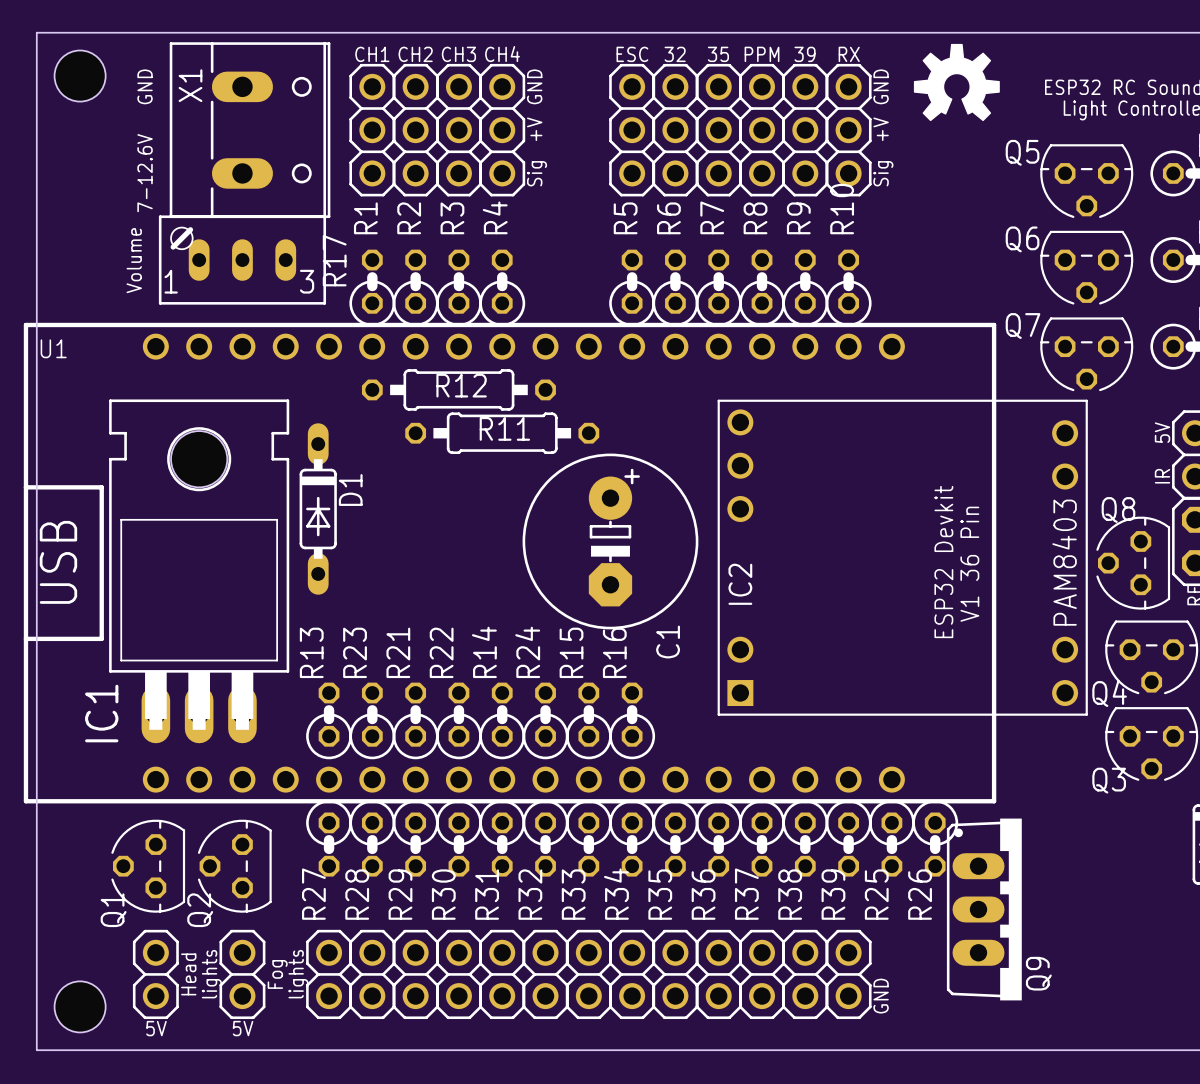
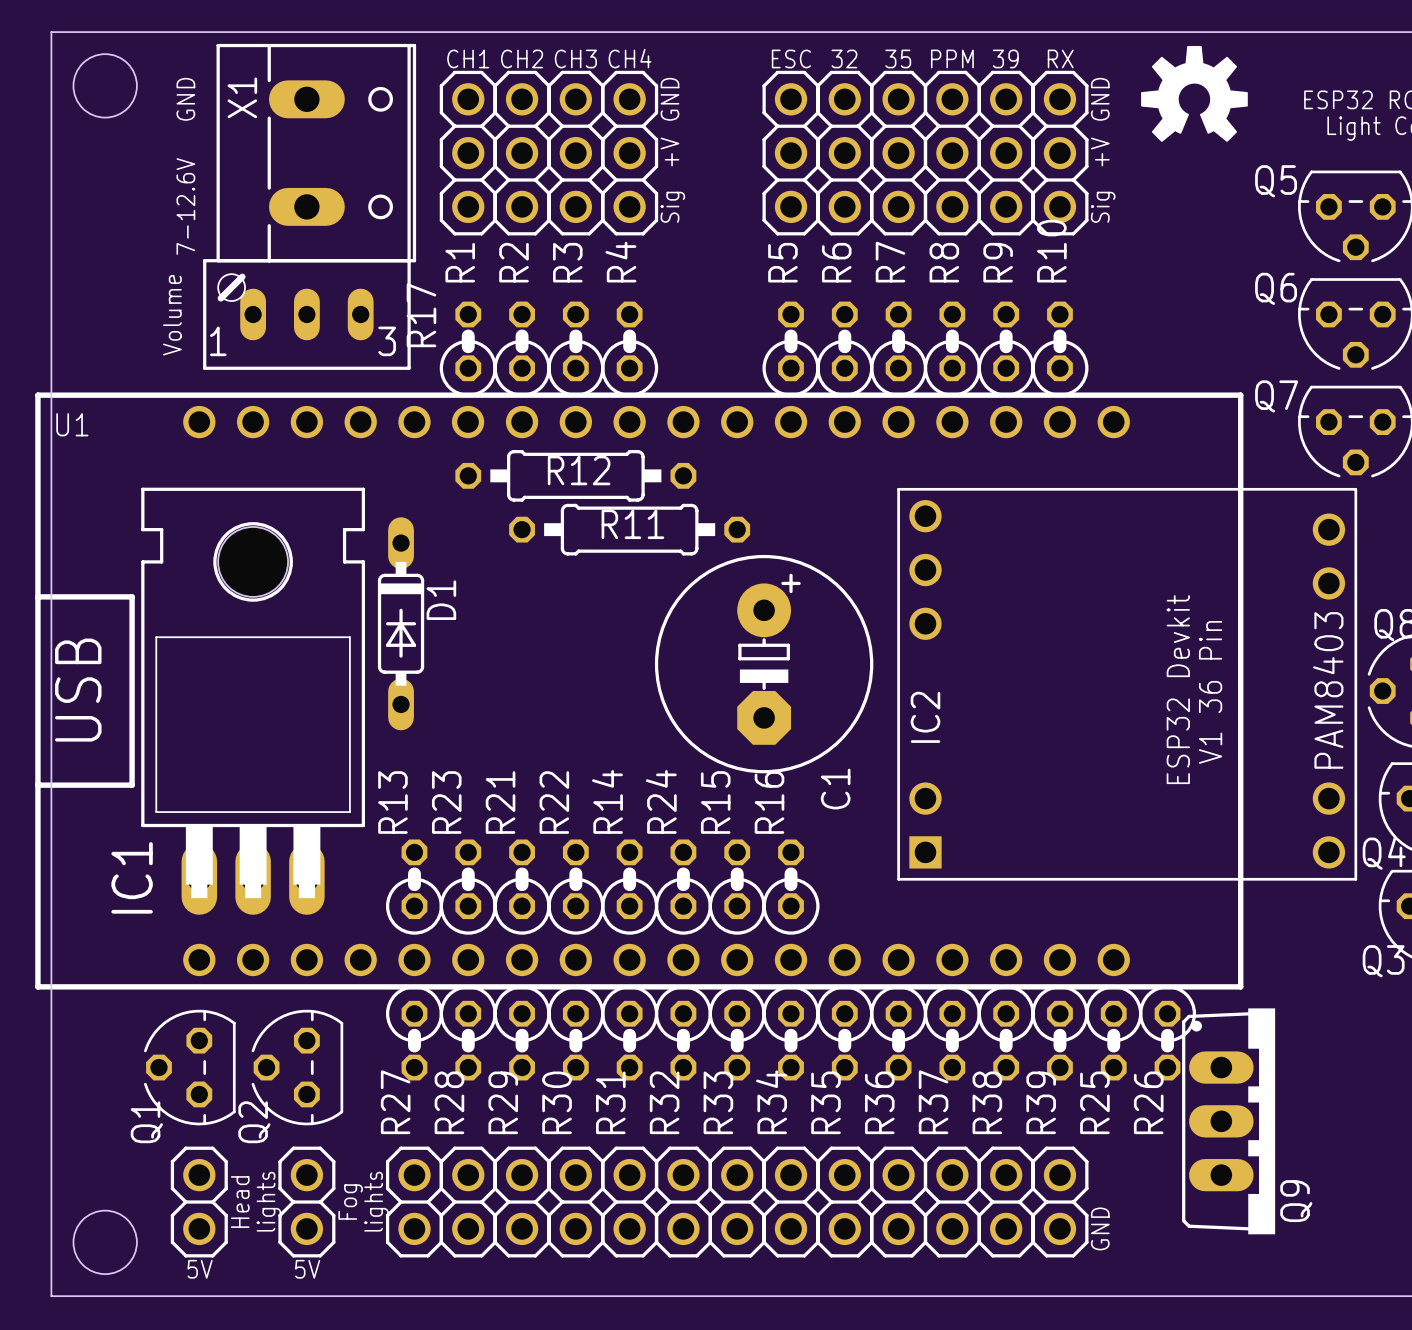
round board edge: none -> [73, 53, 138, 118]
hole: (80, 76) -> none
round board edge: none -> [73, 1210, 138, 1275]
hole: (80, 1006) -> none

